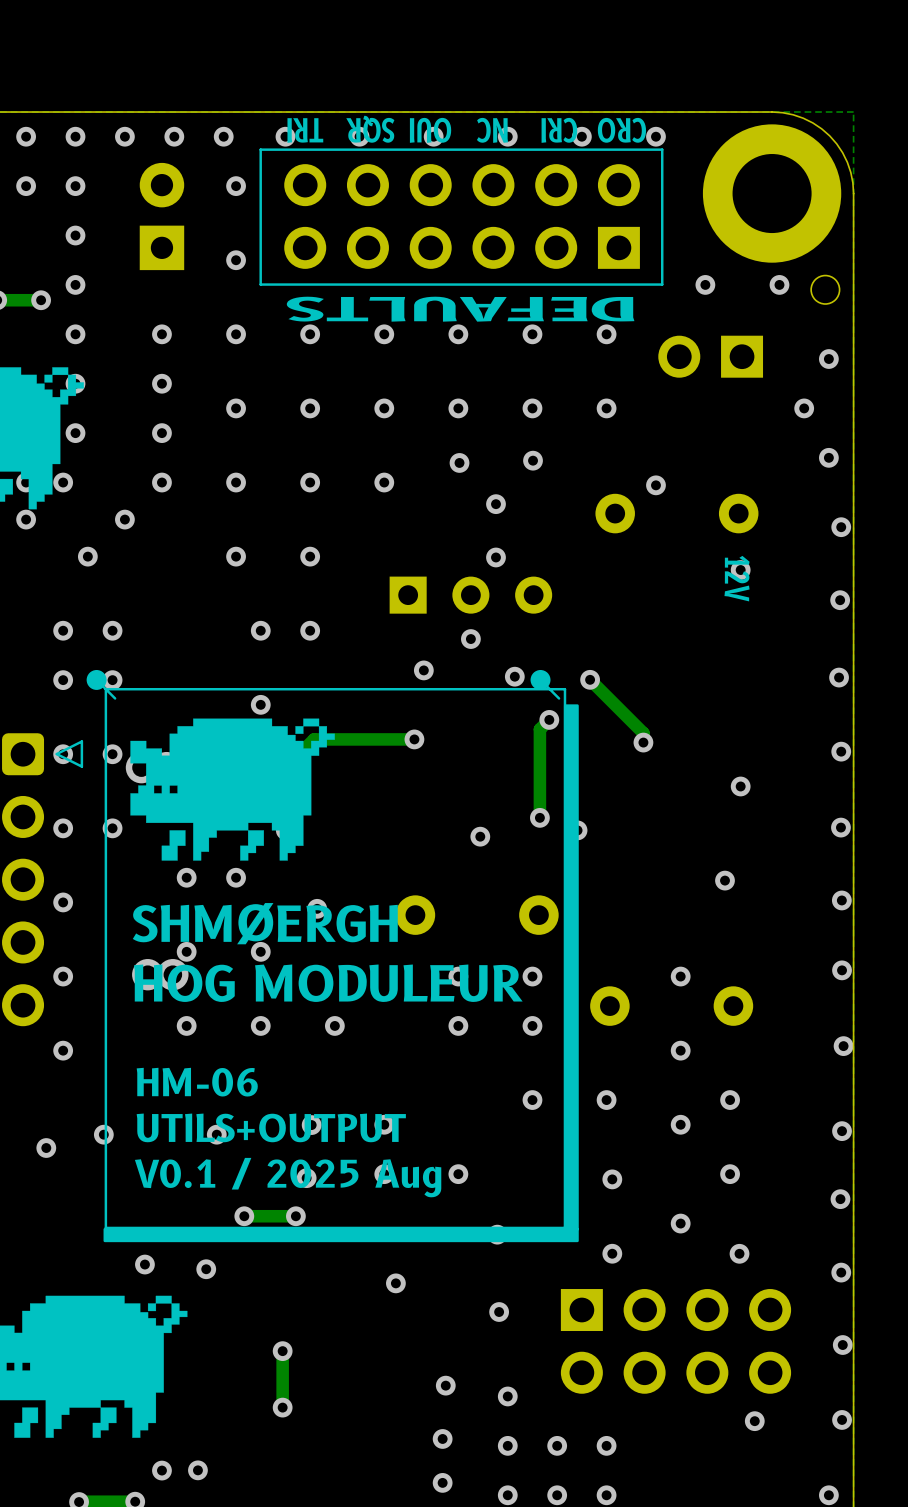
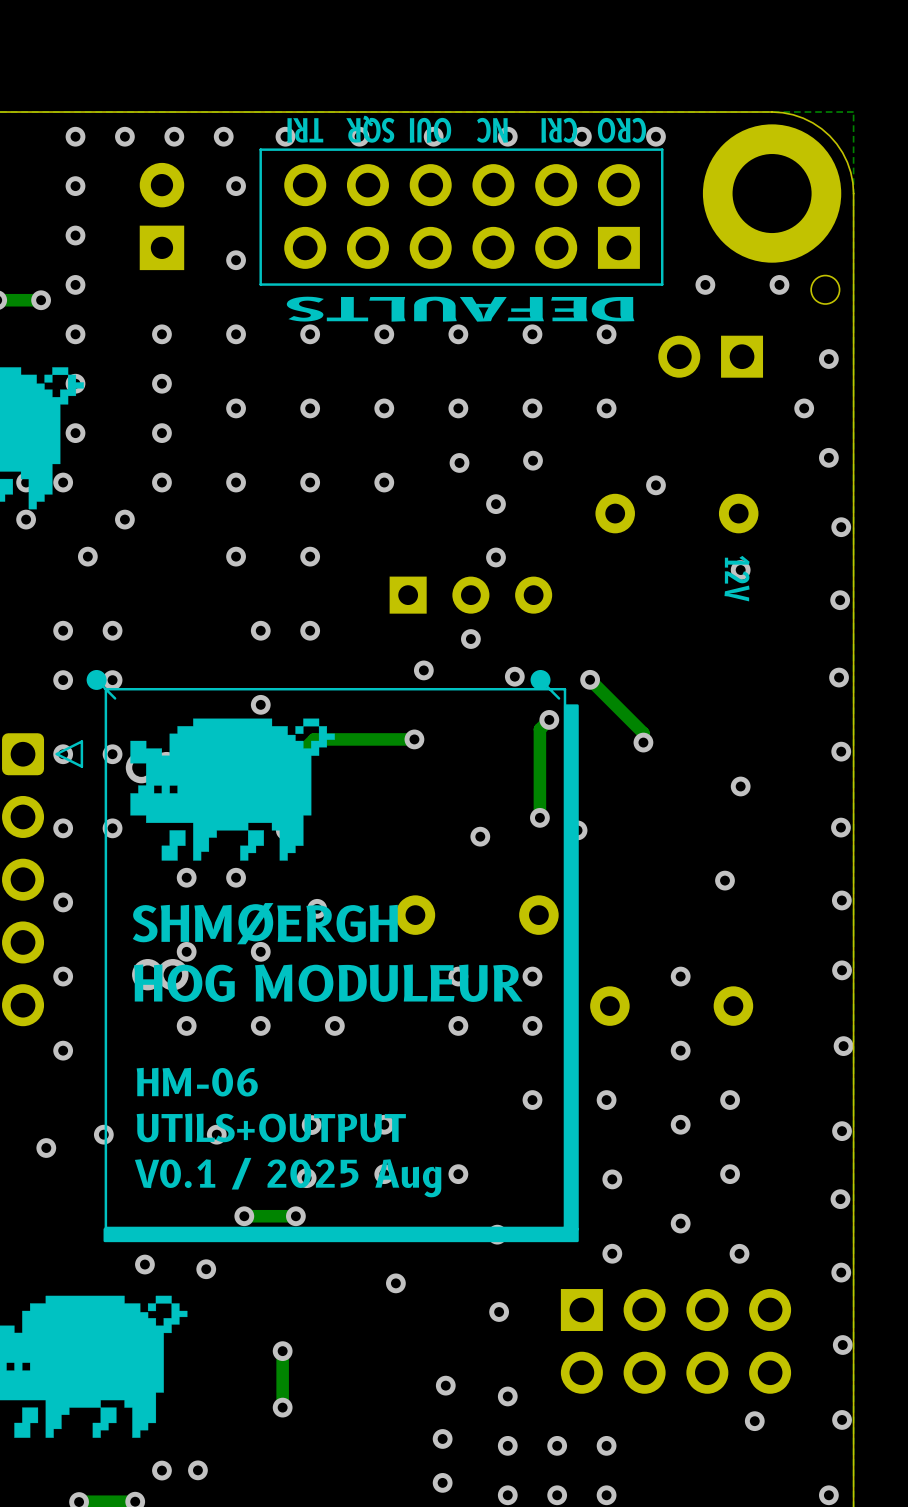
via: (26, 136) -> none
via: (26, 186) -> none

